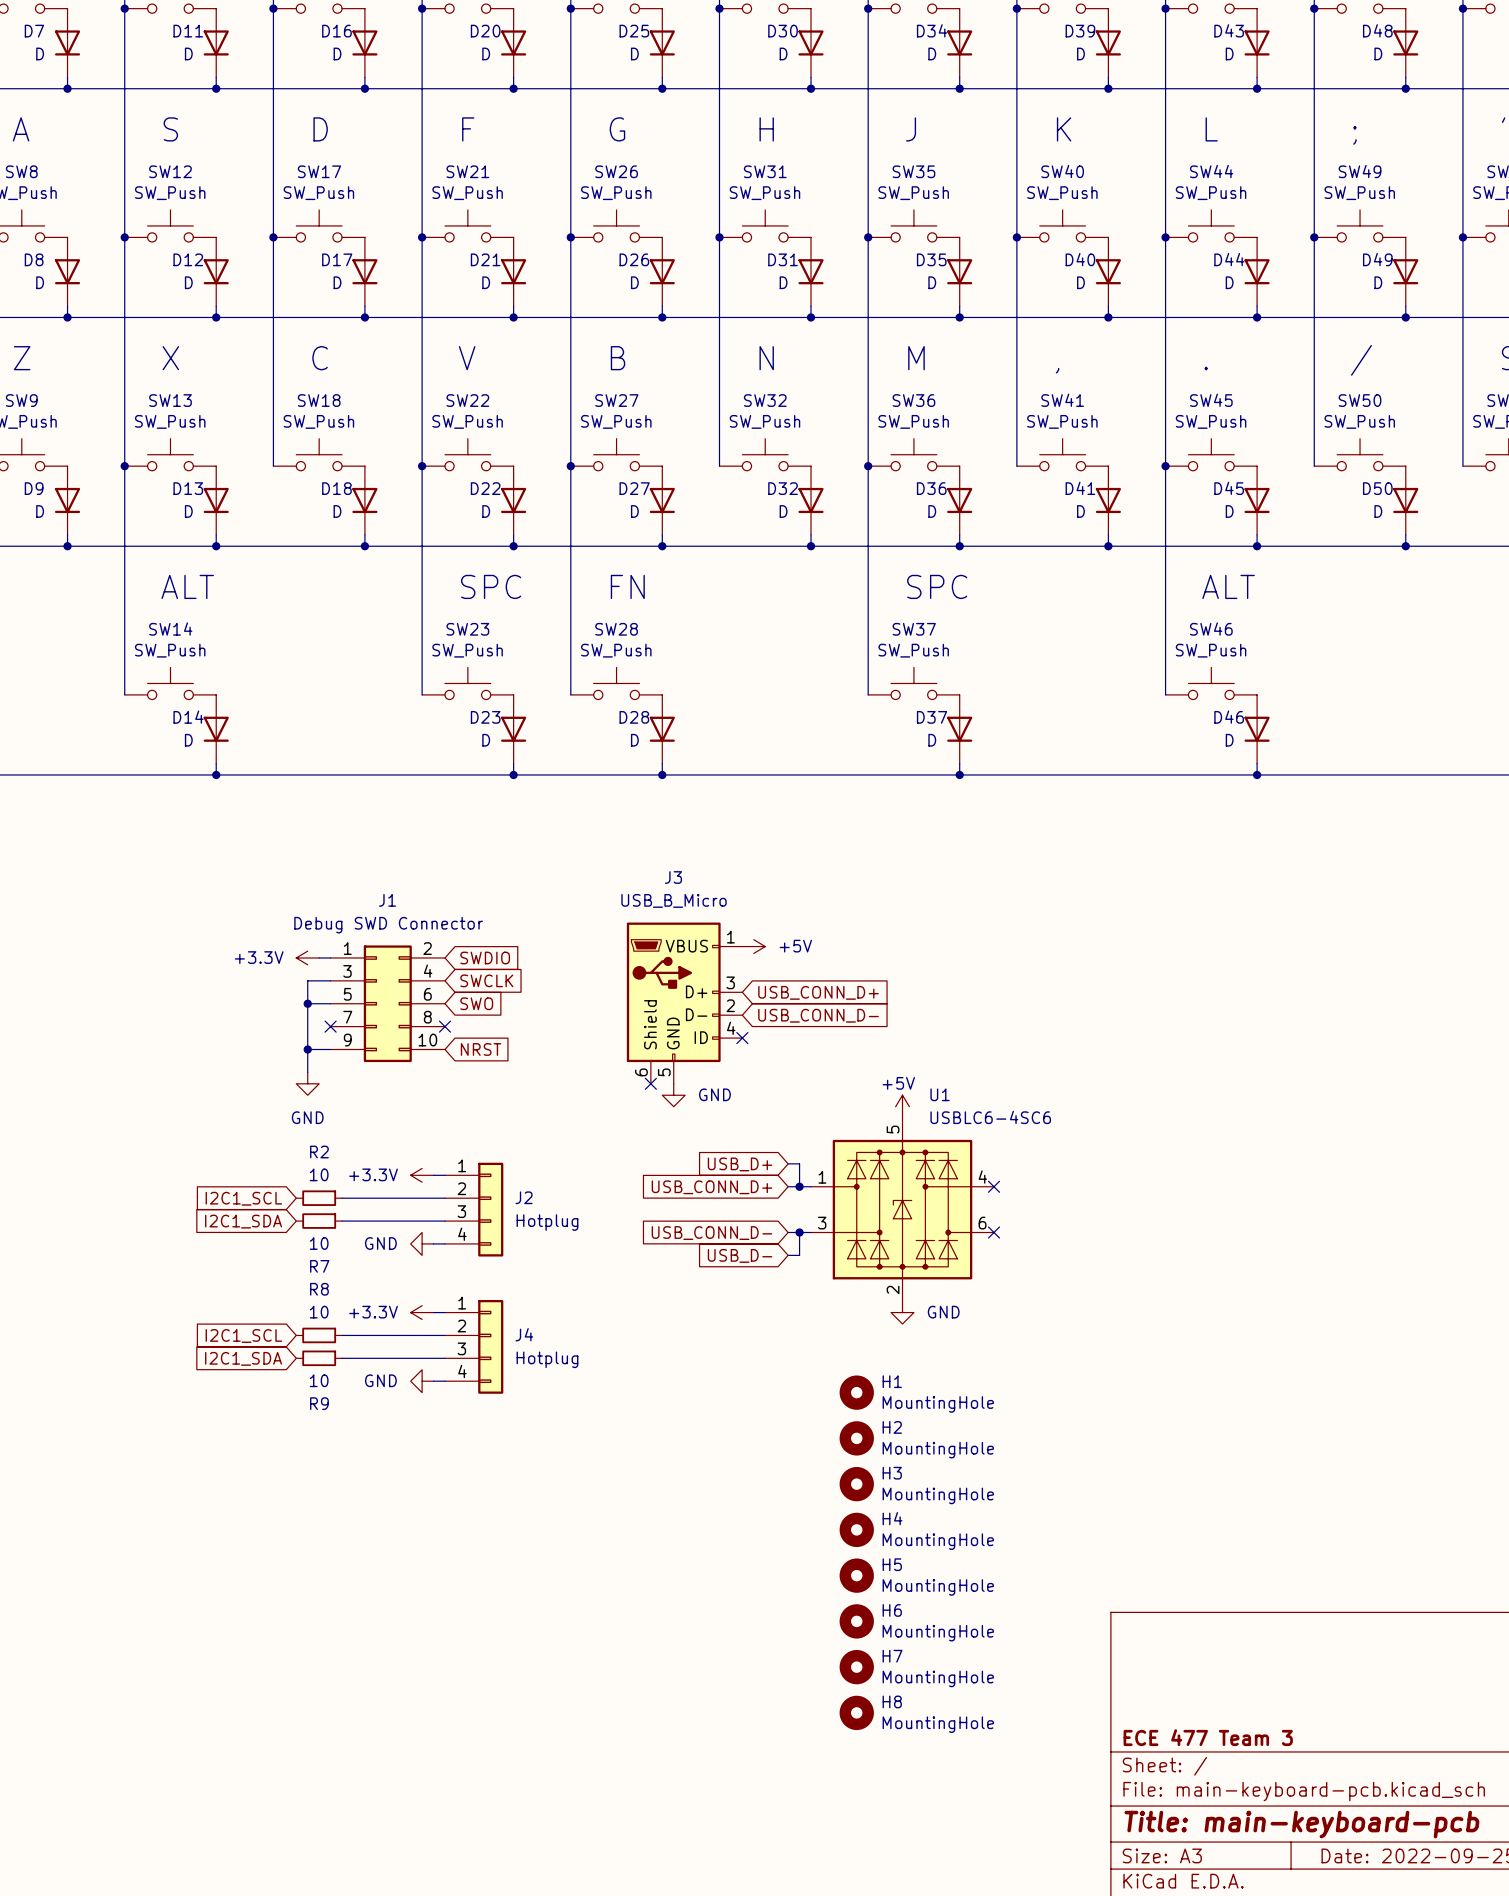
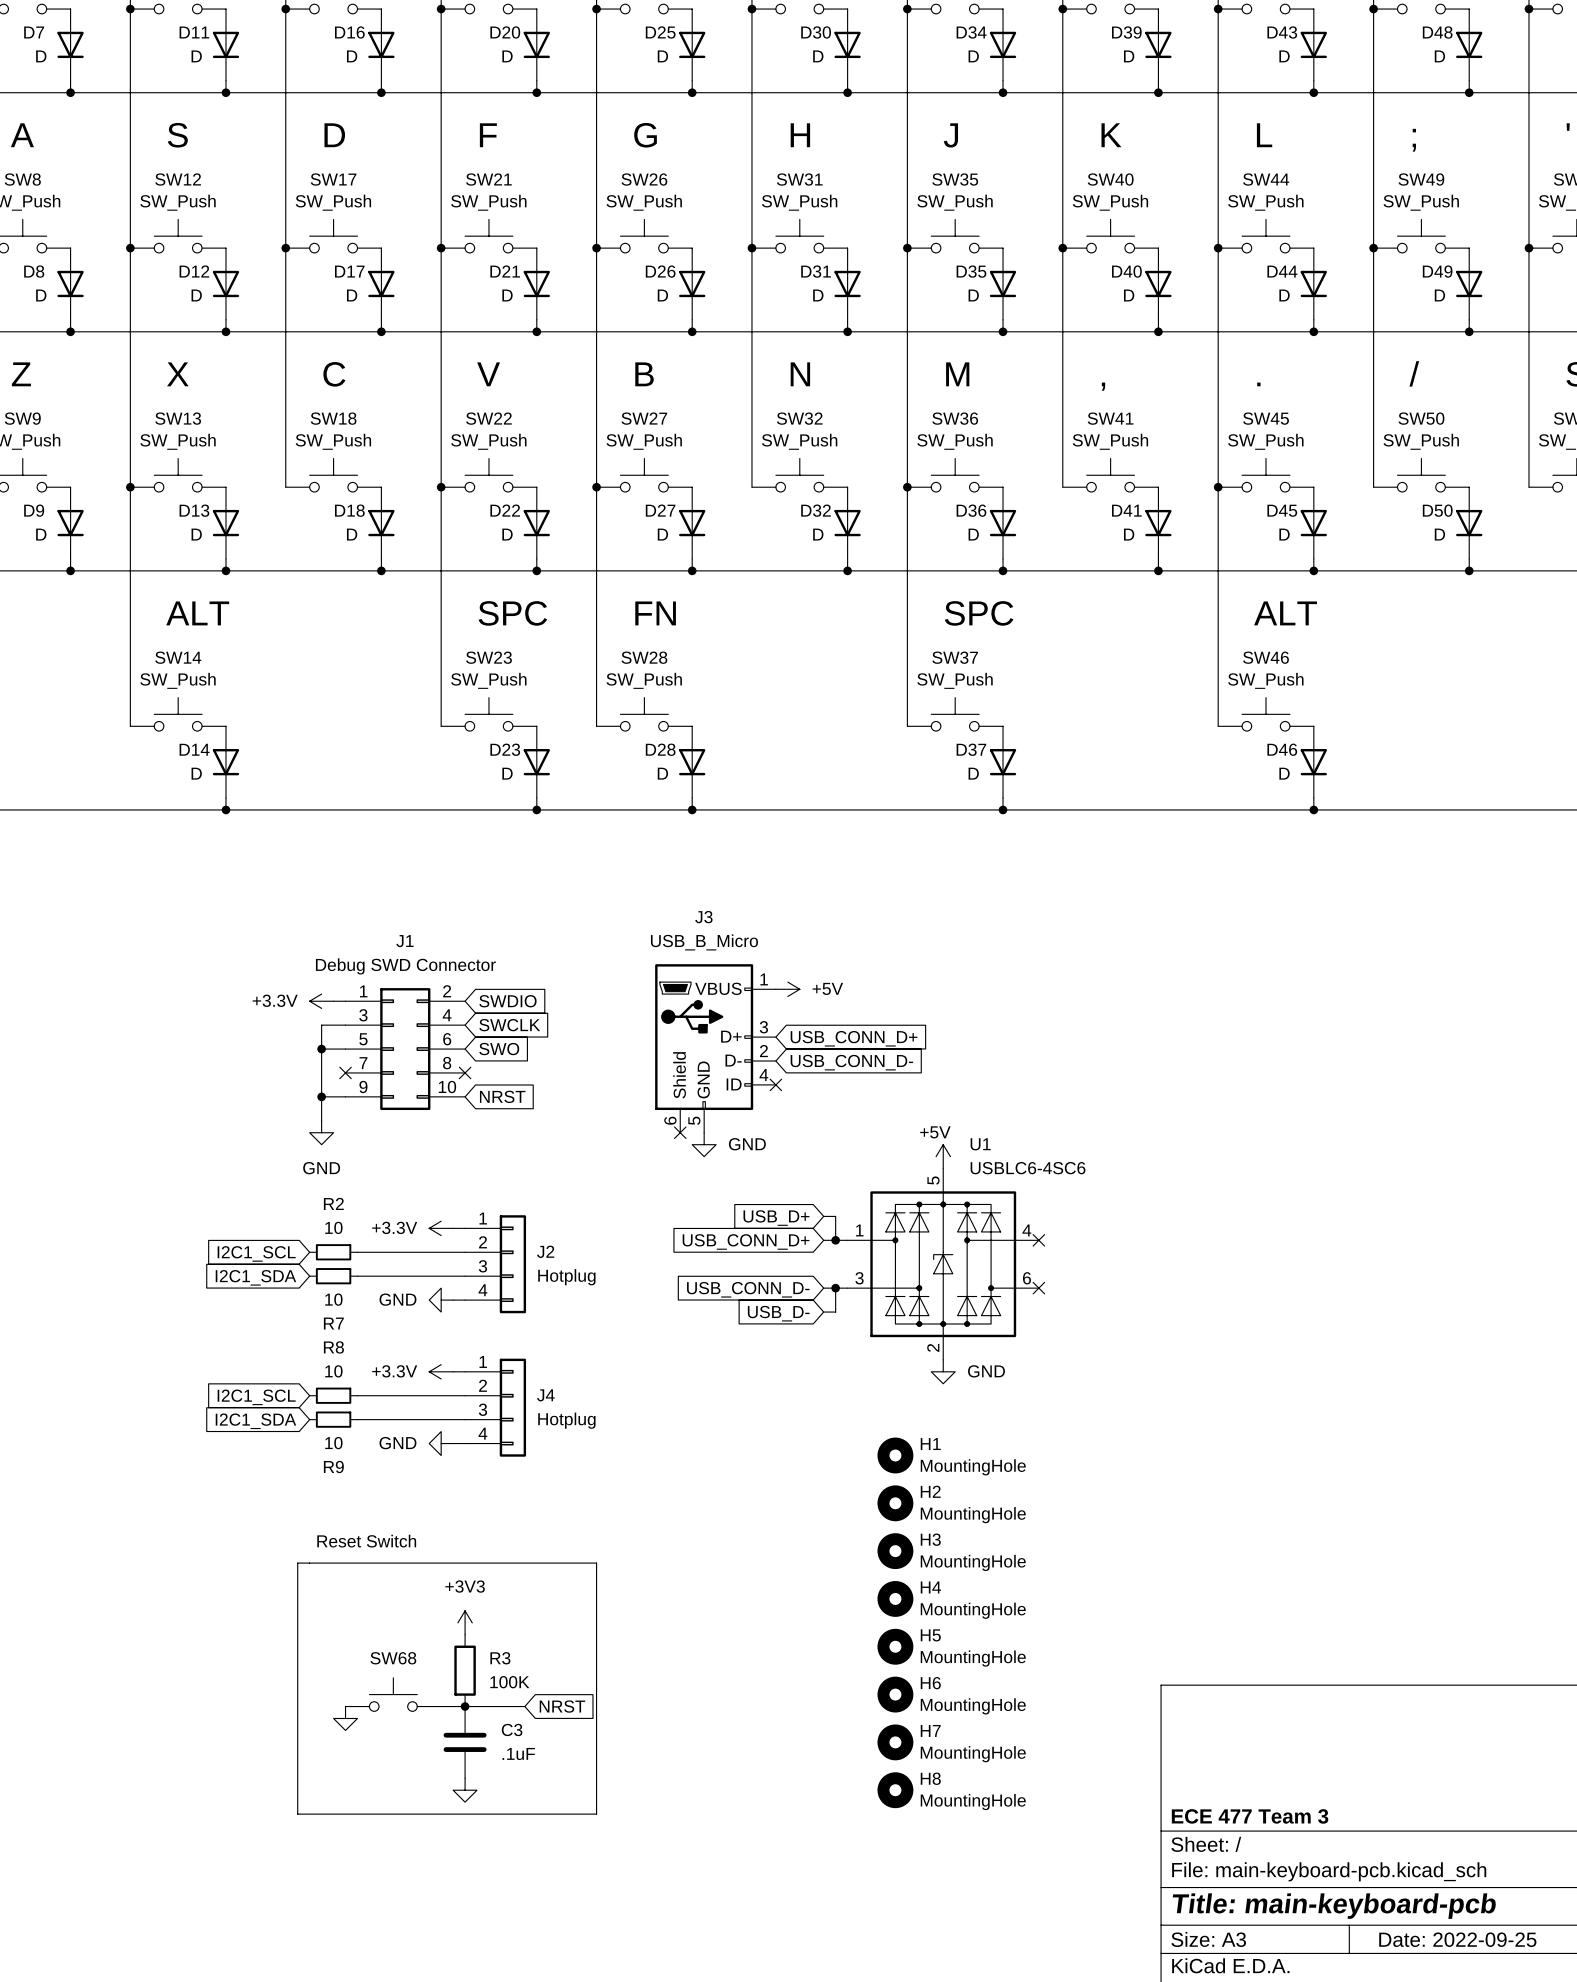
text: none -> Reset Switch (366, 1541)
line: none -> (297, 1563) (297, 1814) (596, 1814) (596, 1563) (297, 1563)
power symbol: none -> +3V3 (465, 1622)
R3: none -> 100K (465, 1670)
SW68: none -> (393, 1694)
wire: none -> (441, 1706) (524, 1706)
junction: none -> (465, 1706)
global label: none -> NRST (562, 1706)
power symbol: none -> (345, 1718)
C3: none -> .1uF (465, 1742)
power symbol: none -> (465, 1790)

